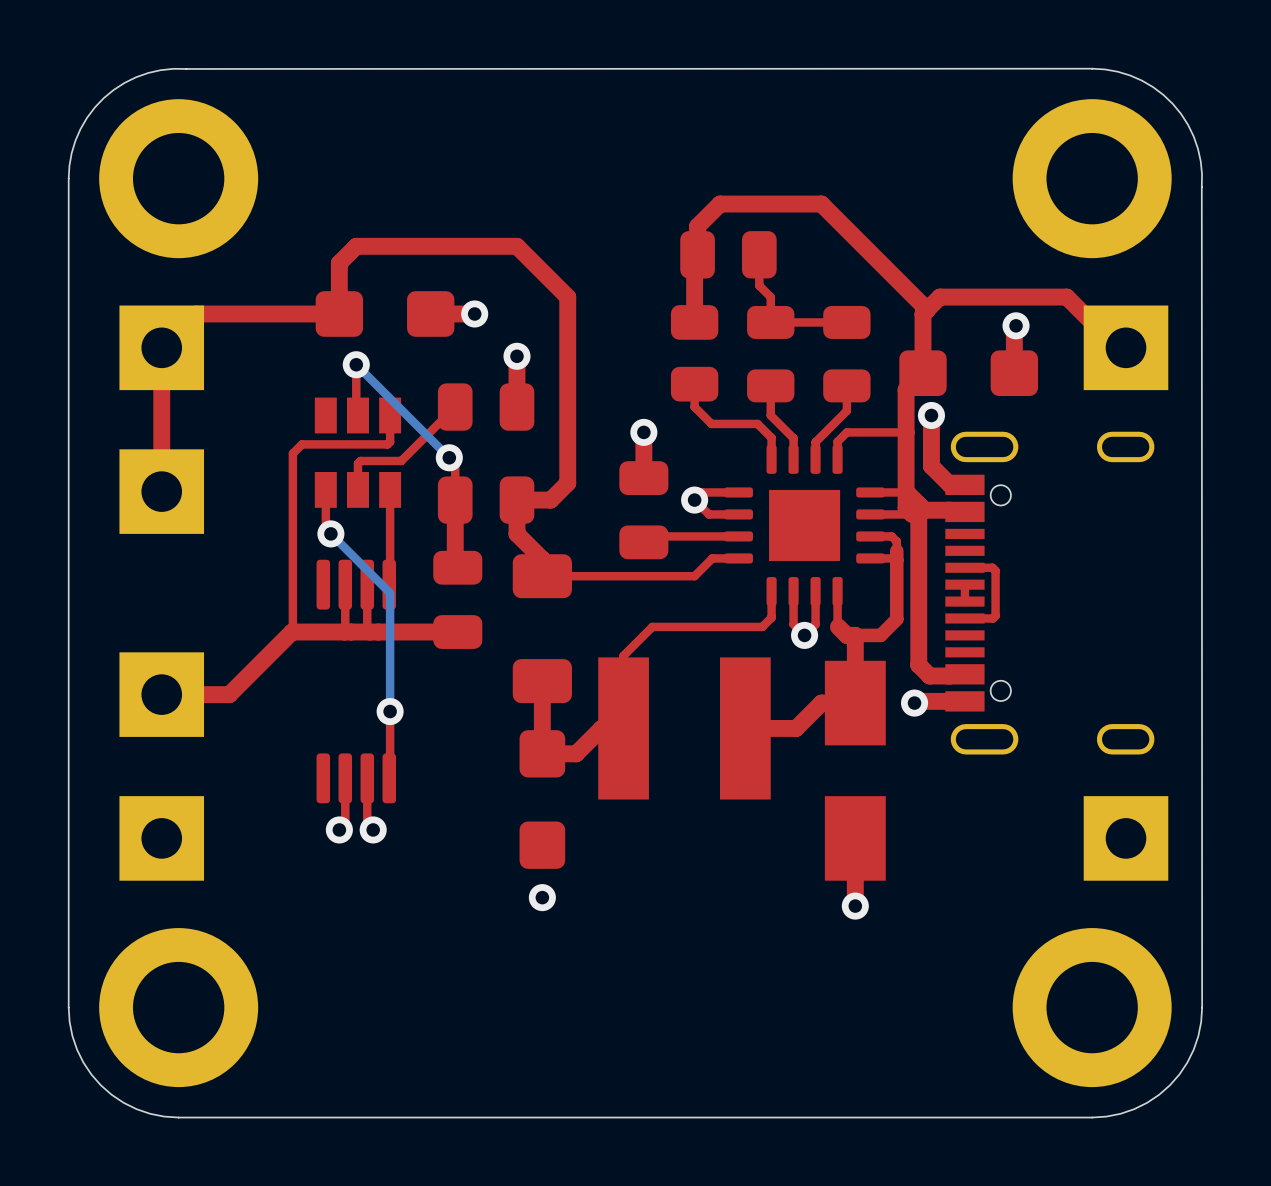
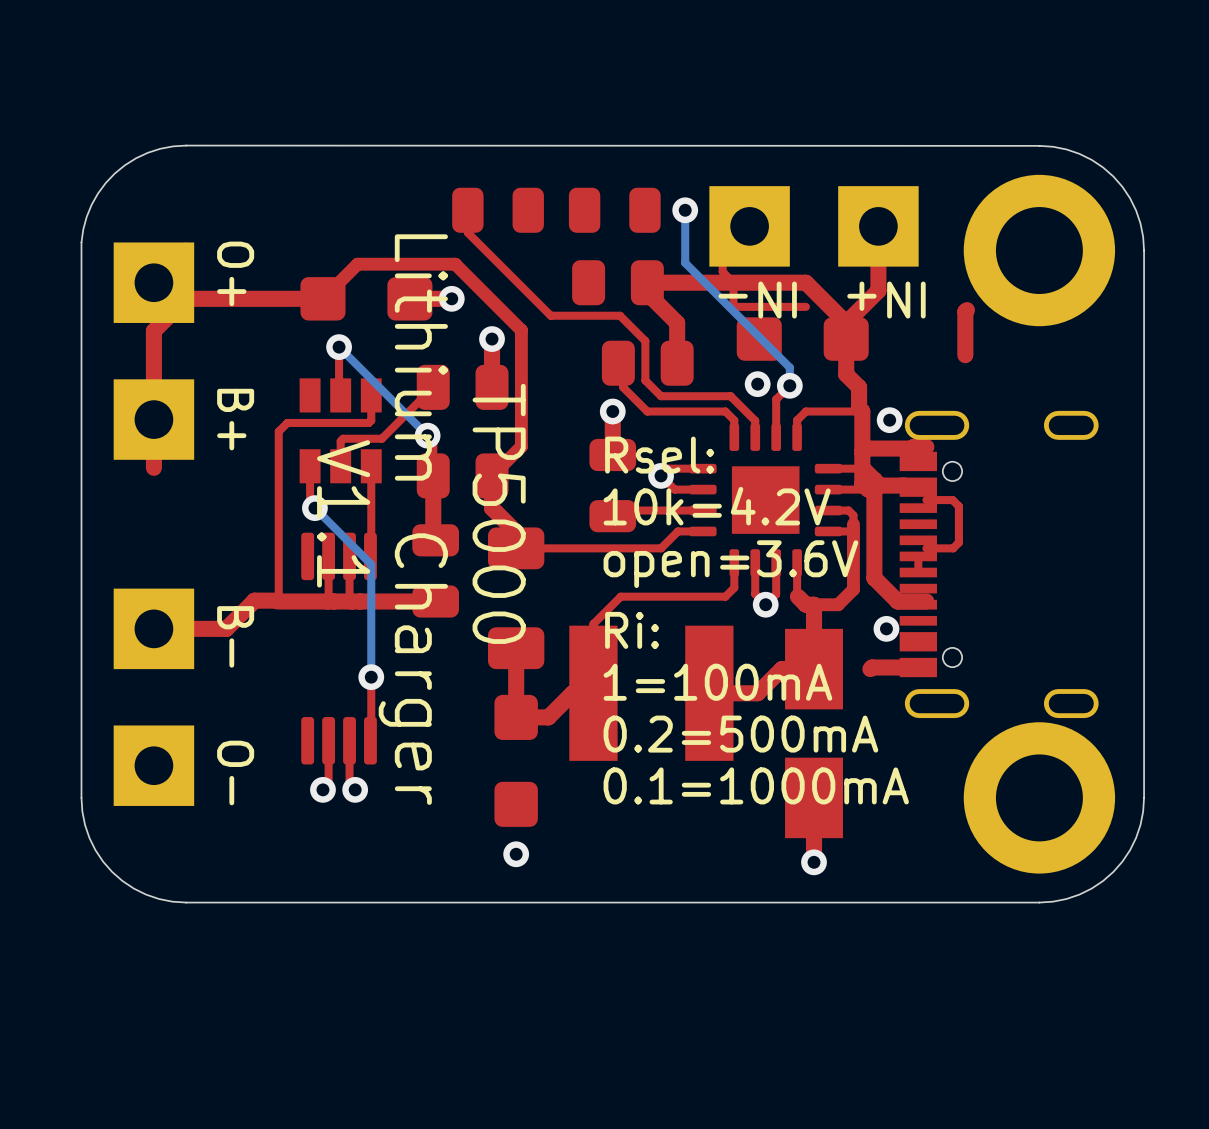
board edge: (1092, 68) (173, 68) (160, 70) (136, 77) (124, 82) (103, 98) (87, 117) (75, 140) (69, 165) (68, 178) (68, 1007) (72, 1036) (77, 1049) (91, 1074) (100, 1085) (111, 1094) (136, 1109) (164, 1116) (178, 1117) (1092, 1117) (1106, 1116) (1134, 1109) (1159, 1094) (1169, 1085) (1179, 1074) (1193, 1049) (1198, 1036) (1202, 1007) (1202, 174) (1197, 148) (1193, 136) (1188, 124) (1172, 103) (1153, 87) (1142, 80) (1117, 71) (1092, 68) -> (186, 145) (173, 146) (147, 152) (135, 158) (114, 173) (105, 182) (91, 204) (86, 216) (81, 242) (81, 797) (85, 825) (95, 850) (103, 861) (122, 880) (133, 888) (159, 899) (186, 902) (1039, 902) (1053, 901) (1079, 894) (1103, 880) (1122, 861) (1130, 850) (1140, 825) (1144, 797) (1144, 250) (1143, 236) (1136, 210) (1122, 186) (1103, 167) (1091, 159) (1066, 149) (1039, 145) (186, 145)
part: (178, 178) -> none
part position: (1092, 178) -> (1039, 250)
part: none -> (498, 210)
part: none -> (614, 210)
bottom track: none -> (685, 210) (685, 262) (789, 367) (789, 385)
via: none -> (685, 210)
part: none -> (749, 226)
top track: none -> (878, 226) (878, 290) (846, 322)
part: none -> (878, 226)
part position: (728, 254) -> (618, 282)
text: none -> O+ (235, 273)
part: none -> (153, 282)
part footprint: [823, 305, 871, 403] -> [736, 317, 869, 361]
top track: (927, 309) (821, 204) (719, 204) (697, 226) (697, 254) (694, 257) (694, 322) -> none
top track: (339, 313) (339, 263) (356, 246) (516, 246) (567, 297) (567, 483) (550, 500) (516, 500) -> (322, 298) (357, 264) (455, 264) (521, 330) (521, 446) (492, 475)
text: none -> IN- (757, 300)
text: none -> IN+ (886, 300)
via: (1016, 325) -> none
top track: none -> (846, 322) (805, 282) (647, 282) (647, 293) (677, 322) (677, 363)
part: (161, 347) -> none
top track: (1125, 347) (1117, 347) (1066, 297) (939, 297) (922, 313) (922, 373) (906, 390) (906, 432) -> (846, 322) (846, 374) (859, 387) (859, 408) (862, 411)
part: (1125, 347) -> none
part rotation: 0° (694, 353) -> 90° clockwise (647, 363)
part: (770, 354) -> none
part: (968, 373) -> none
top track: (694, 384) (694, 407) (711, 423) (757, 423) (771, 437) (771, 441) -> (618, 363) (623, 367) (623, 387) (647, 411) (725, 411) (734, 420)
top track: (770, 385) (770, 415) (793, 438) (793, 442) -> (467, 210) (467, 232) (550, 315) (620, 315) (645, 341) (645, 380) (661, 396) (730, 396) (755, 420)
top track: (846, 385) (846, 410) (815, 442) -> (789, 385) (776, 399) (776, 420)
via: none -> (757, 384)
via: none -> (789, 385)
top track: (931, 415) (931, 466) (950, 484) (964, 484) -> none
via position: (931, 415) -> (889, 420)
part: none -> (153, 419)
text: none -> B+ (235, 419)
top track: none -> (926, 446) (865, 448) (862, 451)
text: none -> Rsel: (659, 455)
part: (161, 491) -> none
top track: none -> (926, 500) (952, 500) (958, 506) (958, 542) (953, 548) (926, 548)
text: none -> 10k=4.2V (717, 506)
text: none -> V1.1 (343, 513)
text: none -> TP5000 (499, 513)
text: none -> Lithium Charger (413, 519)
top track: (964, 567) (992, 567) (995, 570) (995, 615) (993, 618) (964, 618) -> none
text: none -> open=3.6V (730, 564)
top track: (918, 607) (918, 665) (929, 676) (964, 674) -> (874, 578) (897, 601) (926, 601)
top track: (292, 632) (229, 694) (161, 694) -> (278, 600) (254, 600) (226, 628) (153, 628)
text: none -> Ri: (632, 630)
text: none -> B- (235, 636)
part position: (161, 694) -> (153, 628)
via position: (914, 703) -> (886, 628)
text: none -> 1=100mA (717, 682)
text: none -> 0.2=500mA (740, 734)
part footprint: [1083, 796, 1169, 881] -> [963, 722, 1116, 874]
text: none -> O- (235, 773)
text: none -> 0.1=1000mA (756, 785)
part position: (161, 838) -> (153, 765)
part: (178, 1007) -> none
part: (1092, 1007) -> none

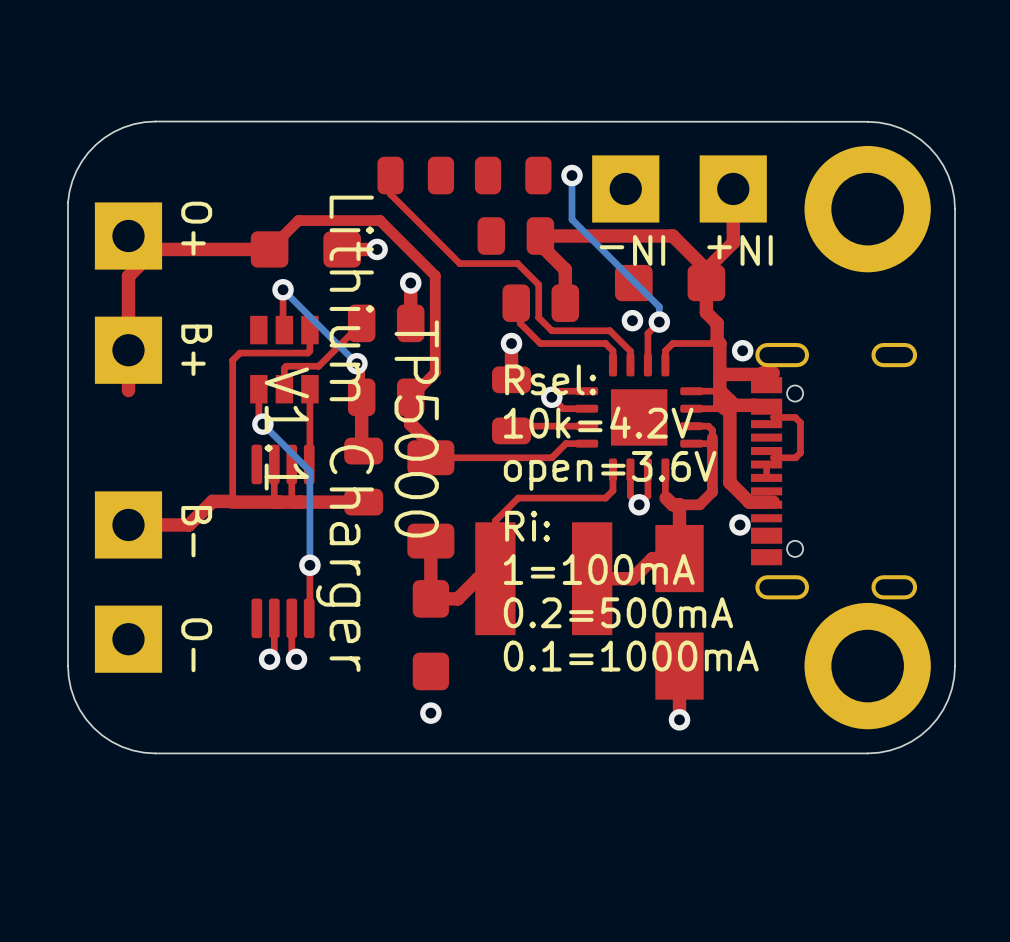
top track: (722, 242) (722, 271) (733, 282) (733, 306) (805, 306) -> none
top track: (966, 310) (965, 311) (965, 355) -> none
top track: (918, 667) (871, 667) (870, 669) -> none

